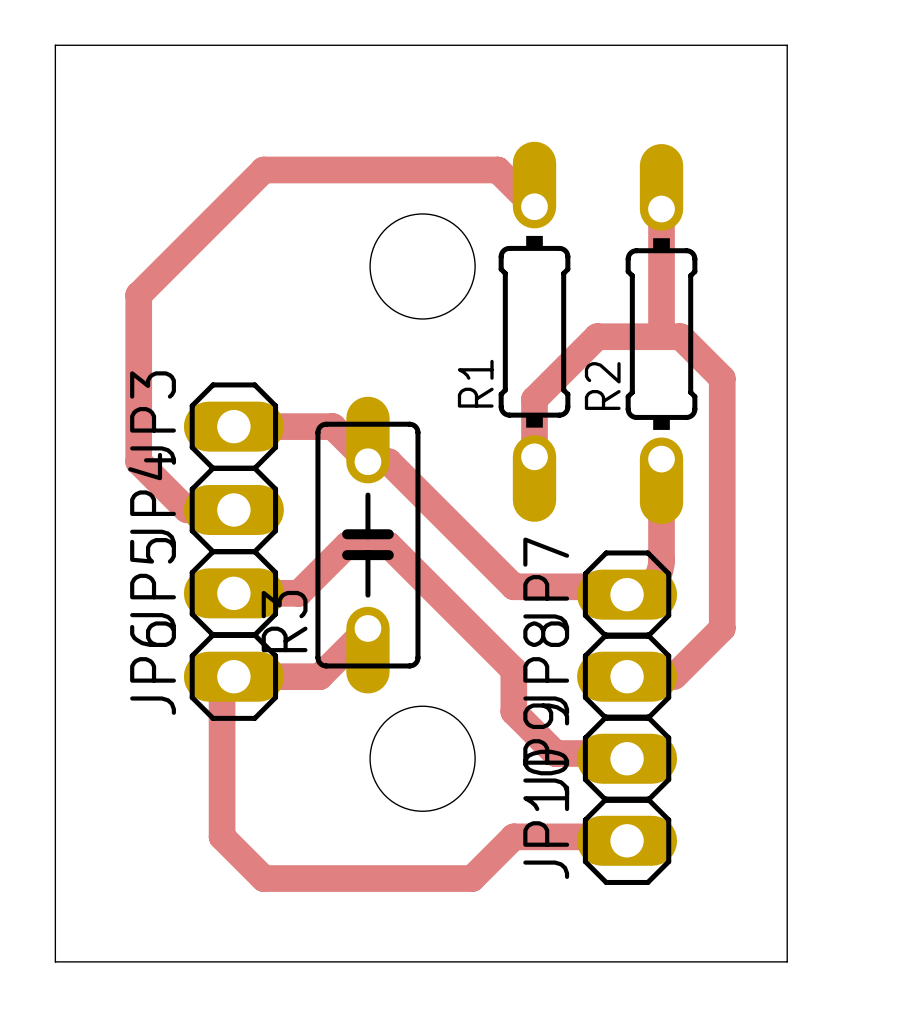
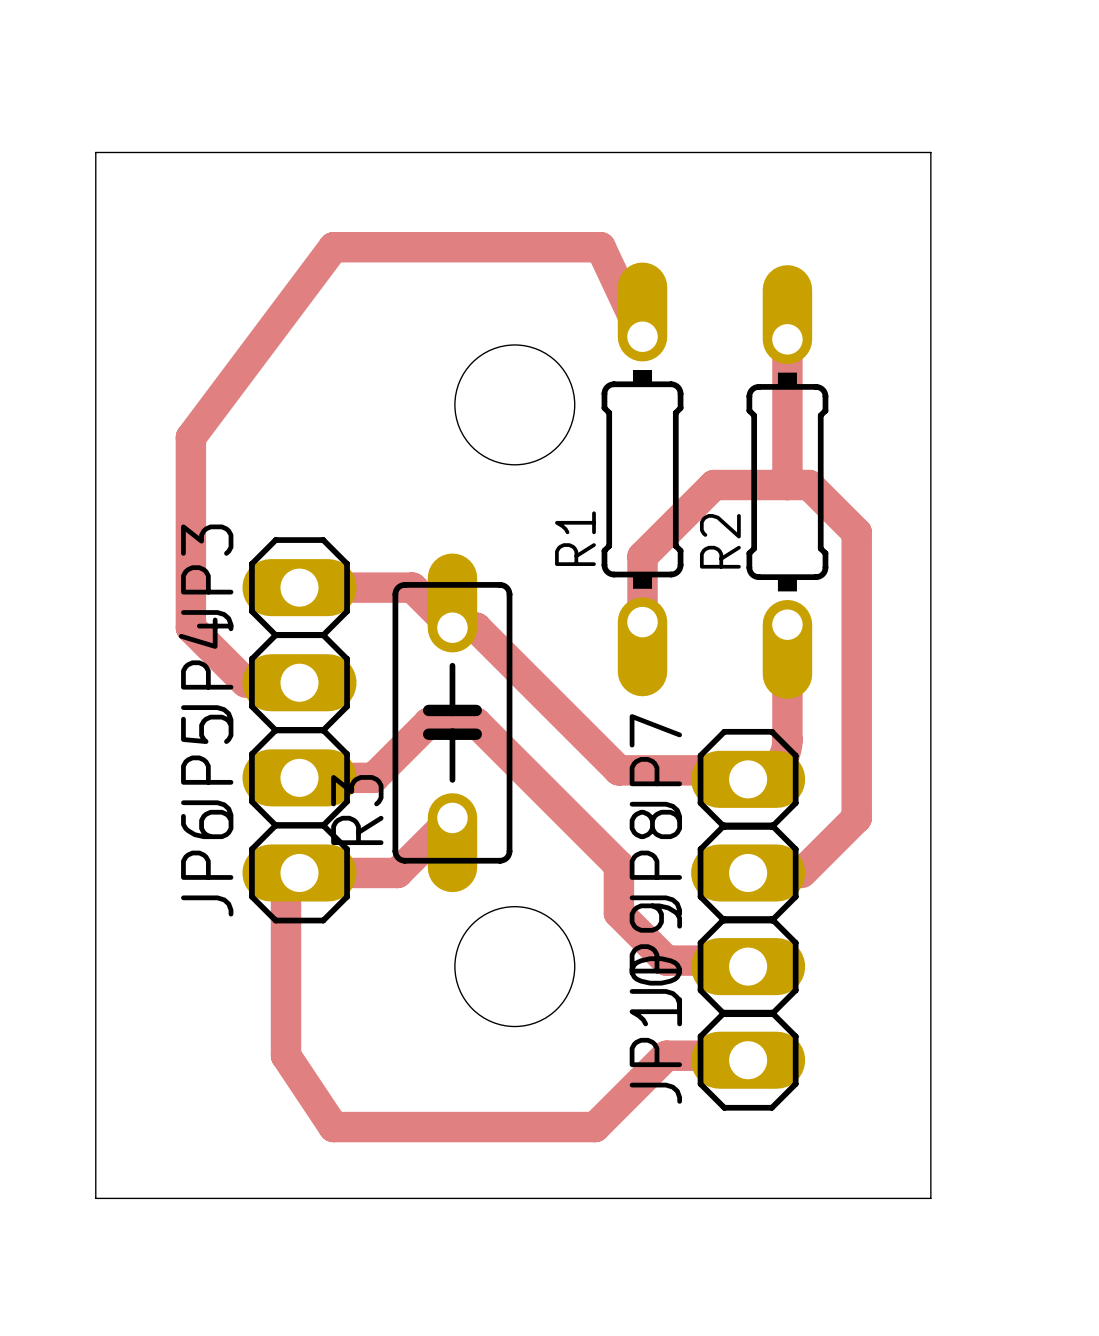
top track: (534, 206) (497, 169) (263, 169) (138, 295) -> (642, 336) (600, 247) (333, 247) (190, 437)
top track: (222, 836) (263, 878) (472, 878) (513, 836) (555, 836) -> (286, 1055) (333, 1127) (595, 1127) (666, 1055)

